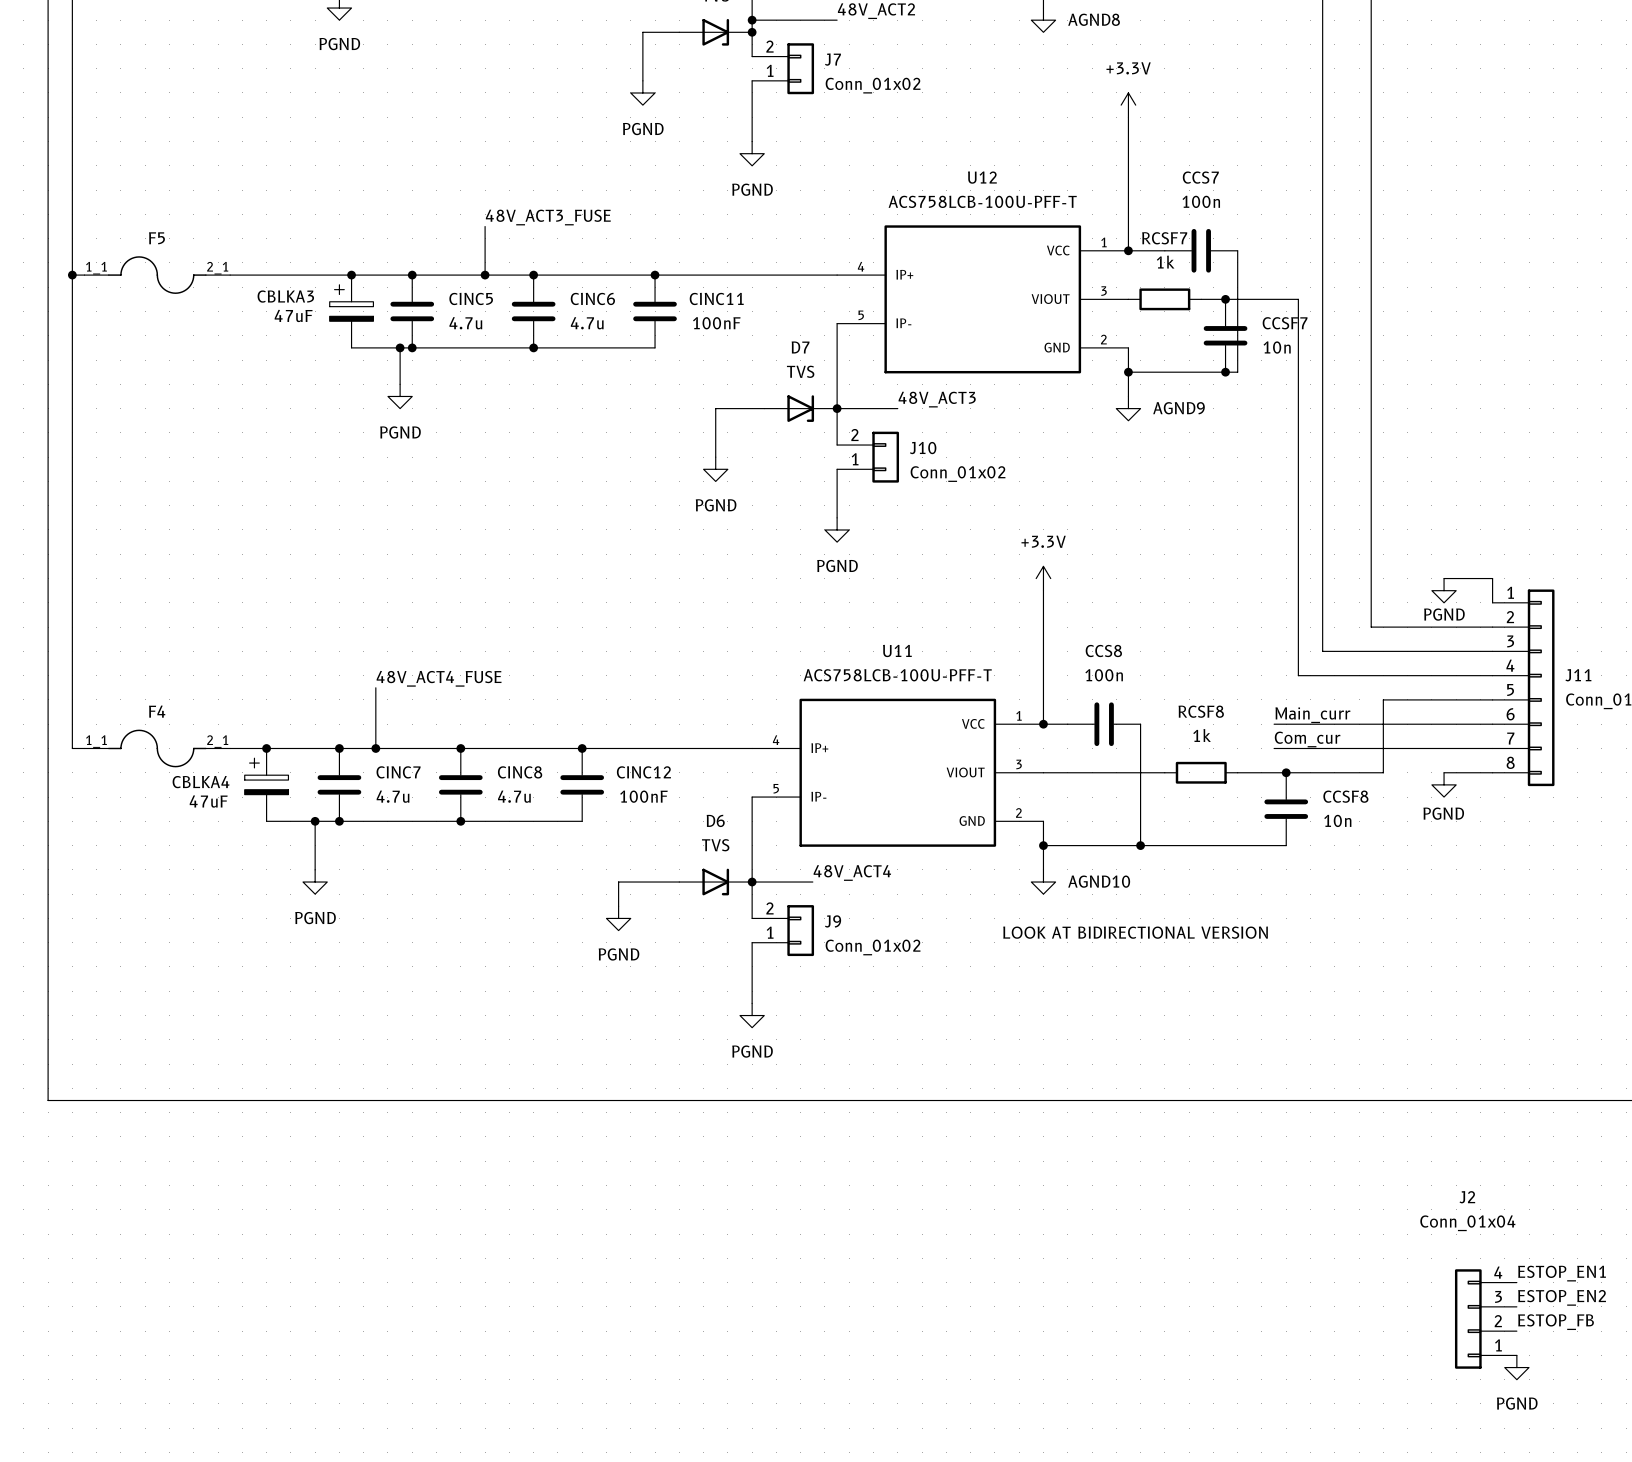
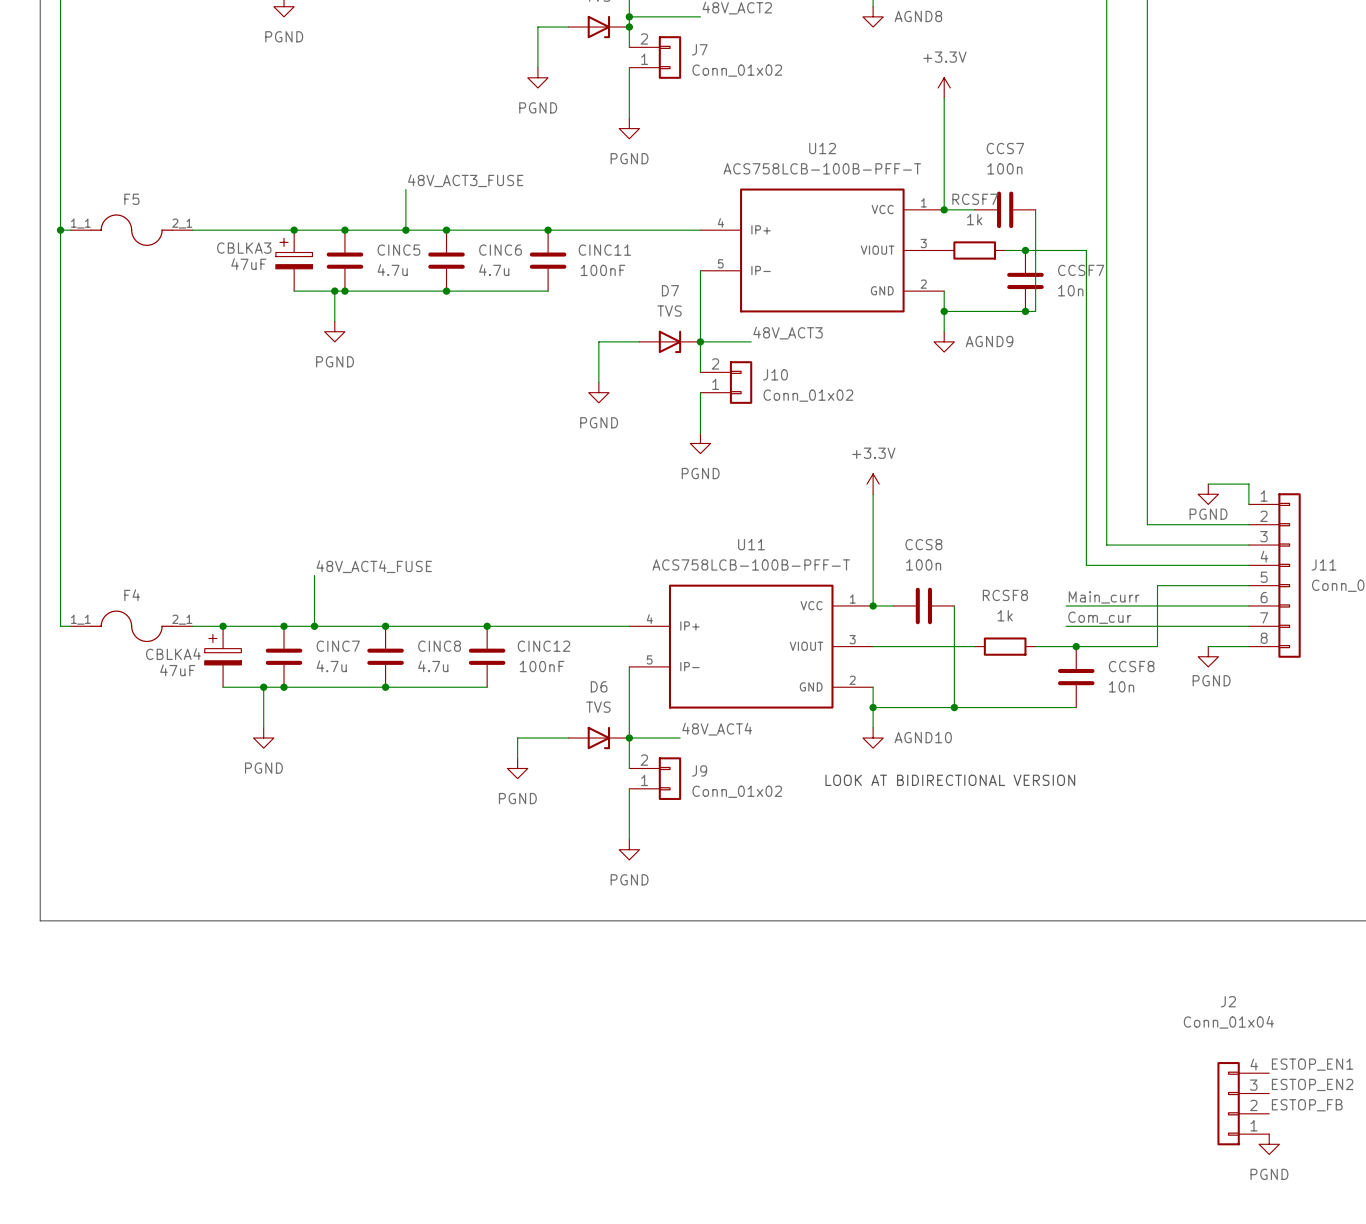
U12 value: ACS758LCB-100U-PFF-T (982, 201) -> ACS758LCB-100B-PFF-T (822, 168)
U11 value: ACS758LCB-100U-PFF-T (897, 675) -> ACS758LCB-100B-PFF-T (751, 564)

